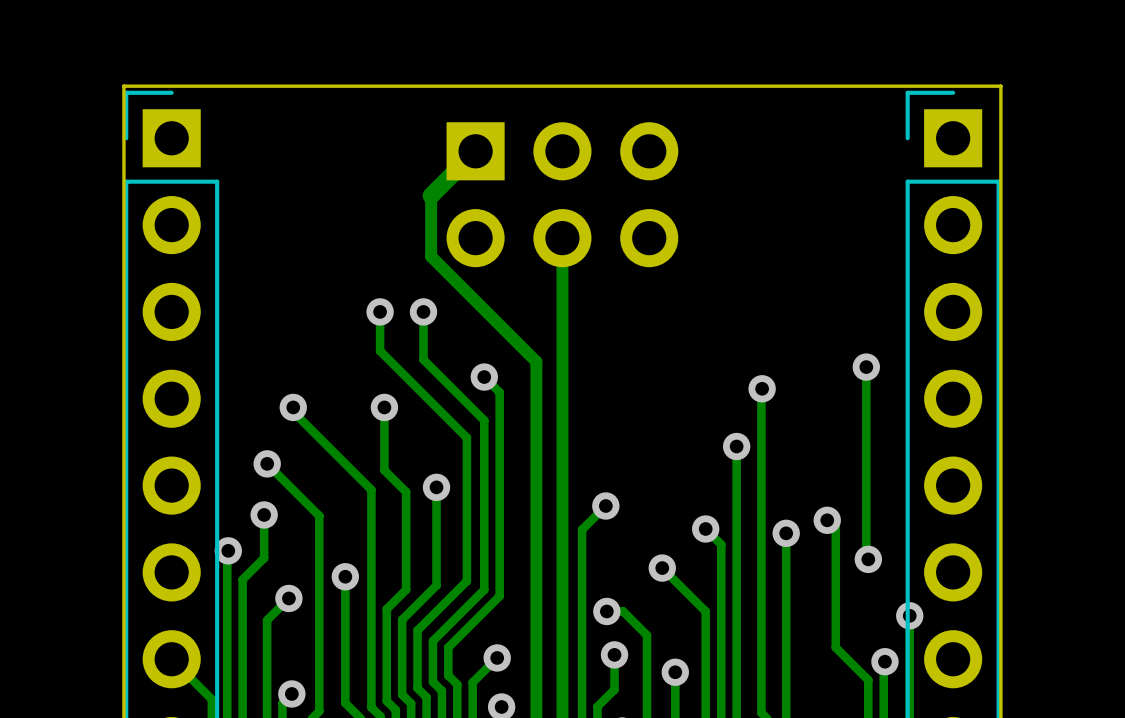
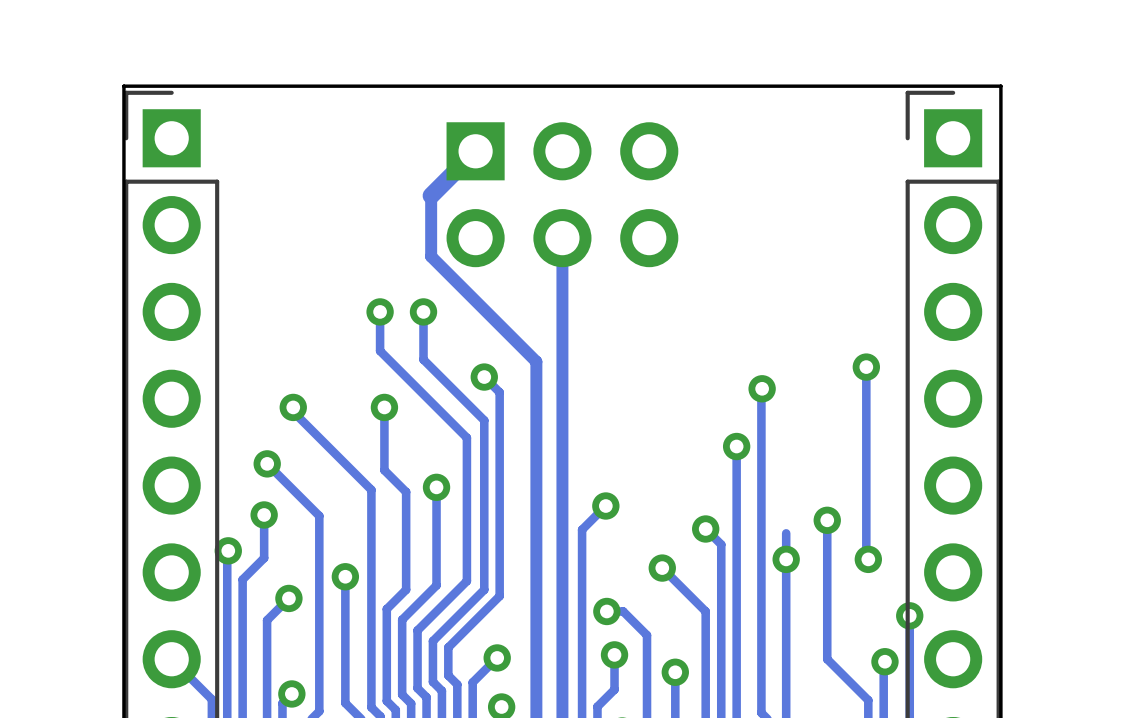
track: (827, 520) (835, 528) (835, 647) (868, 680) (868, 700) -> (827, 520) (827, 659) (868, 700)
via position: (786, 533) -> (786, 559)

